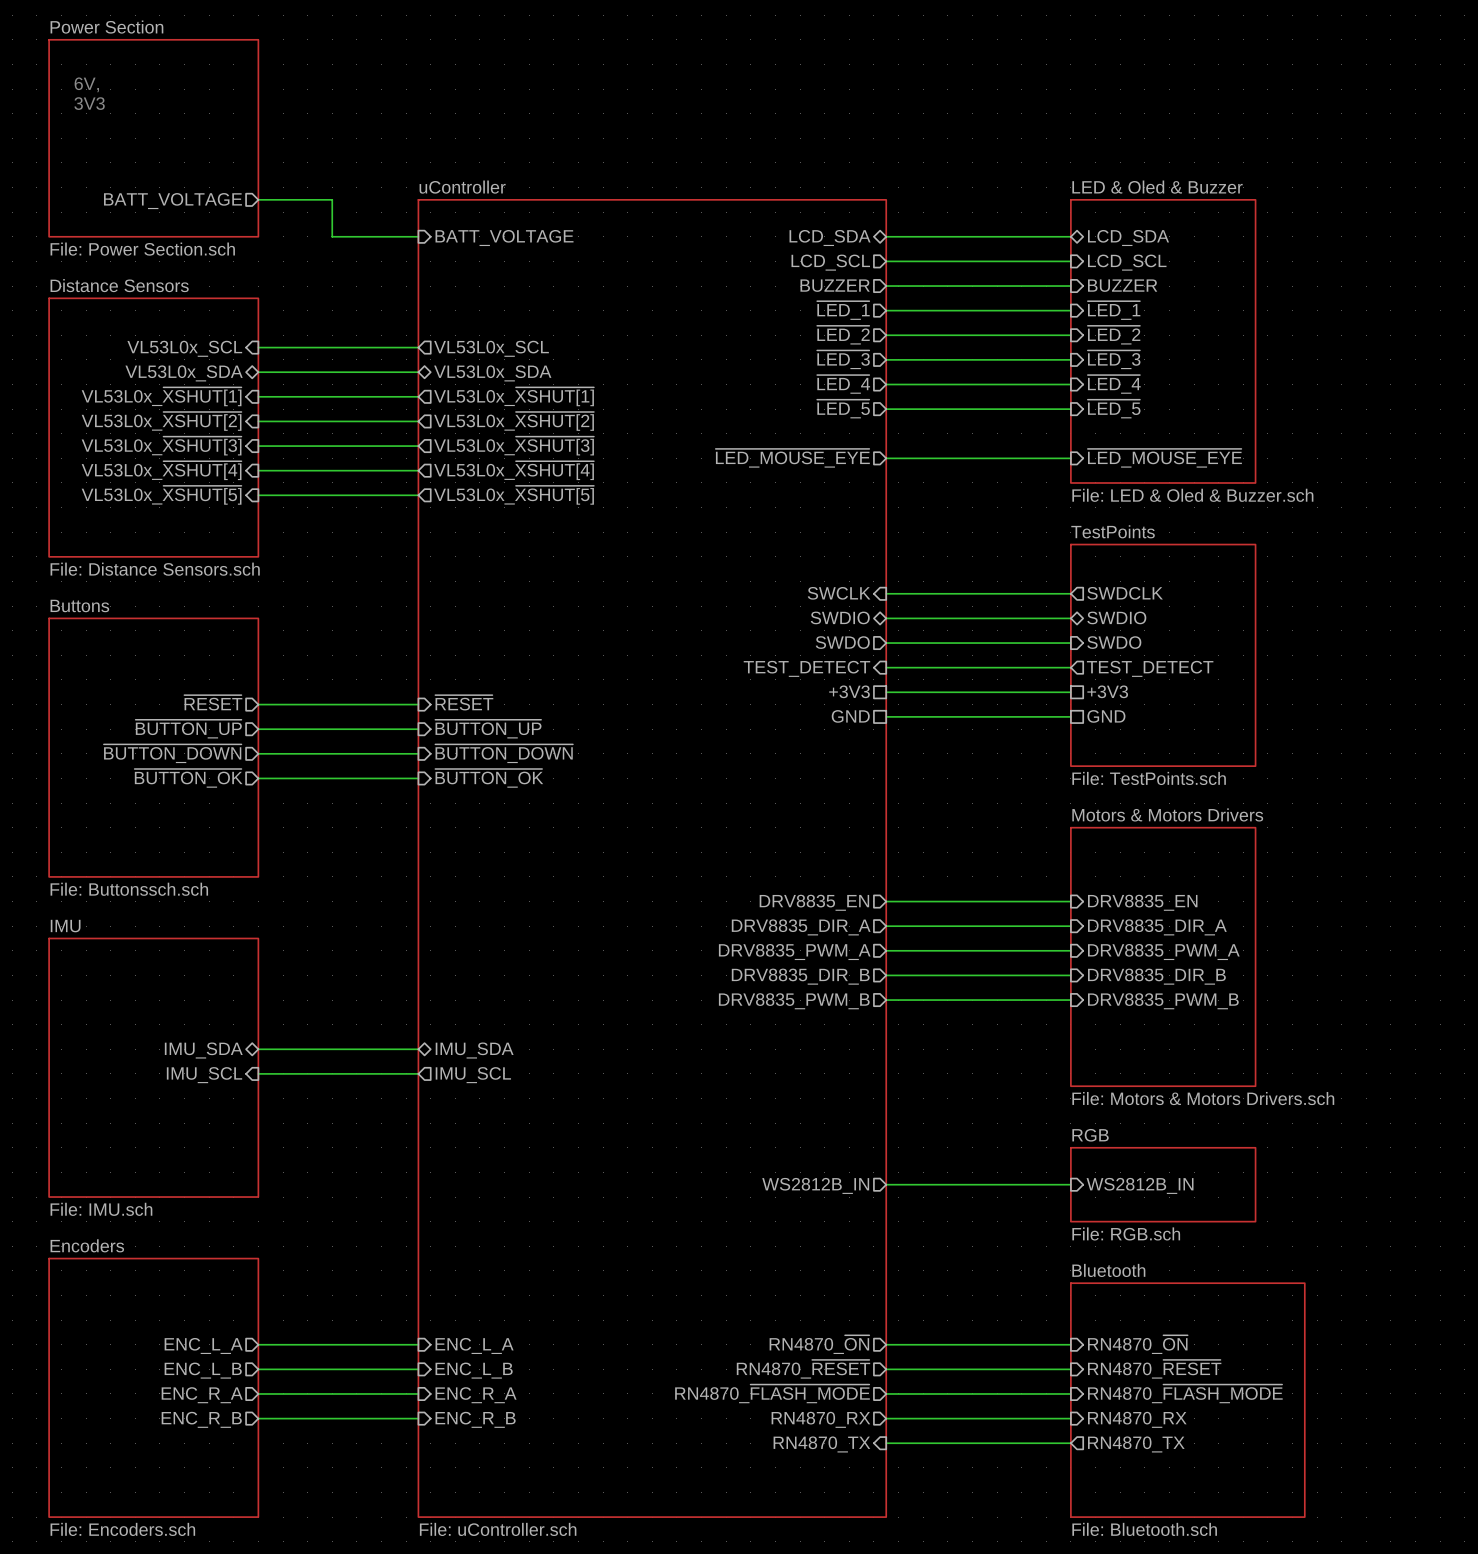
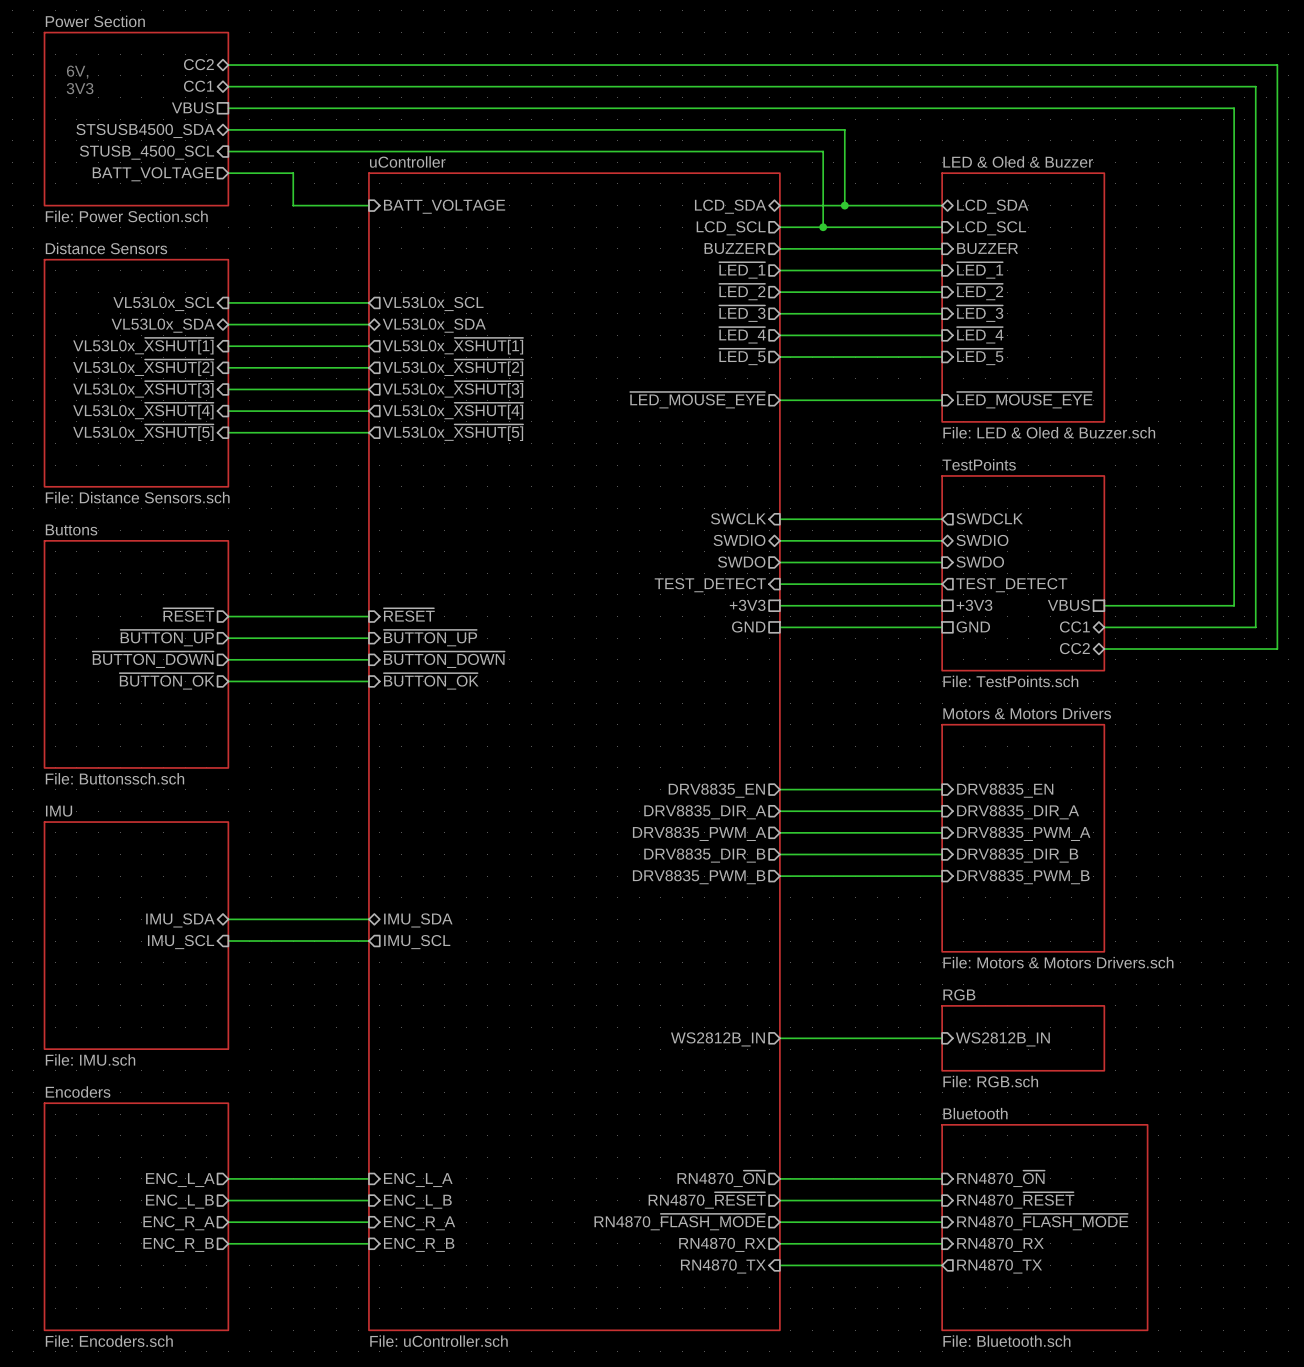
sheet pin: none -> CC2 (198, 64)
wire: none -> (228, 65) (1277, 65) (1277, 649) (1104, 649)
sheet pin: none -> CC1 (198, 86)
wire: none -> (228, 86) (1255, 86) (1255, 627) (1104, 627)
sheet pin: none -> VBUS (192, 107)
wire: none -> (228, 108) (1234, 108) (1234, 605) (1104, 605)
wire: none -> (228, 129) (844, 129) (844, 205)
sheet pin: none -> STSUSB4500_SDA (145, 130)
wire: none -> (228, 151) (823, 151) (823, 227)
sheet pin: none -> STUSB_4500_SCL (147, 152)
junction: none -> (844, 205)
junction: none -> (823, 227)
sheet pin: none -> VBUS (1068, 605)
sheet pin: none -> CC1 (1074, 626)
sheet pin: none -> CC2 (1074, 648)

